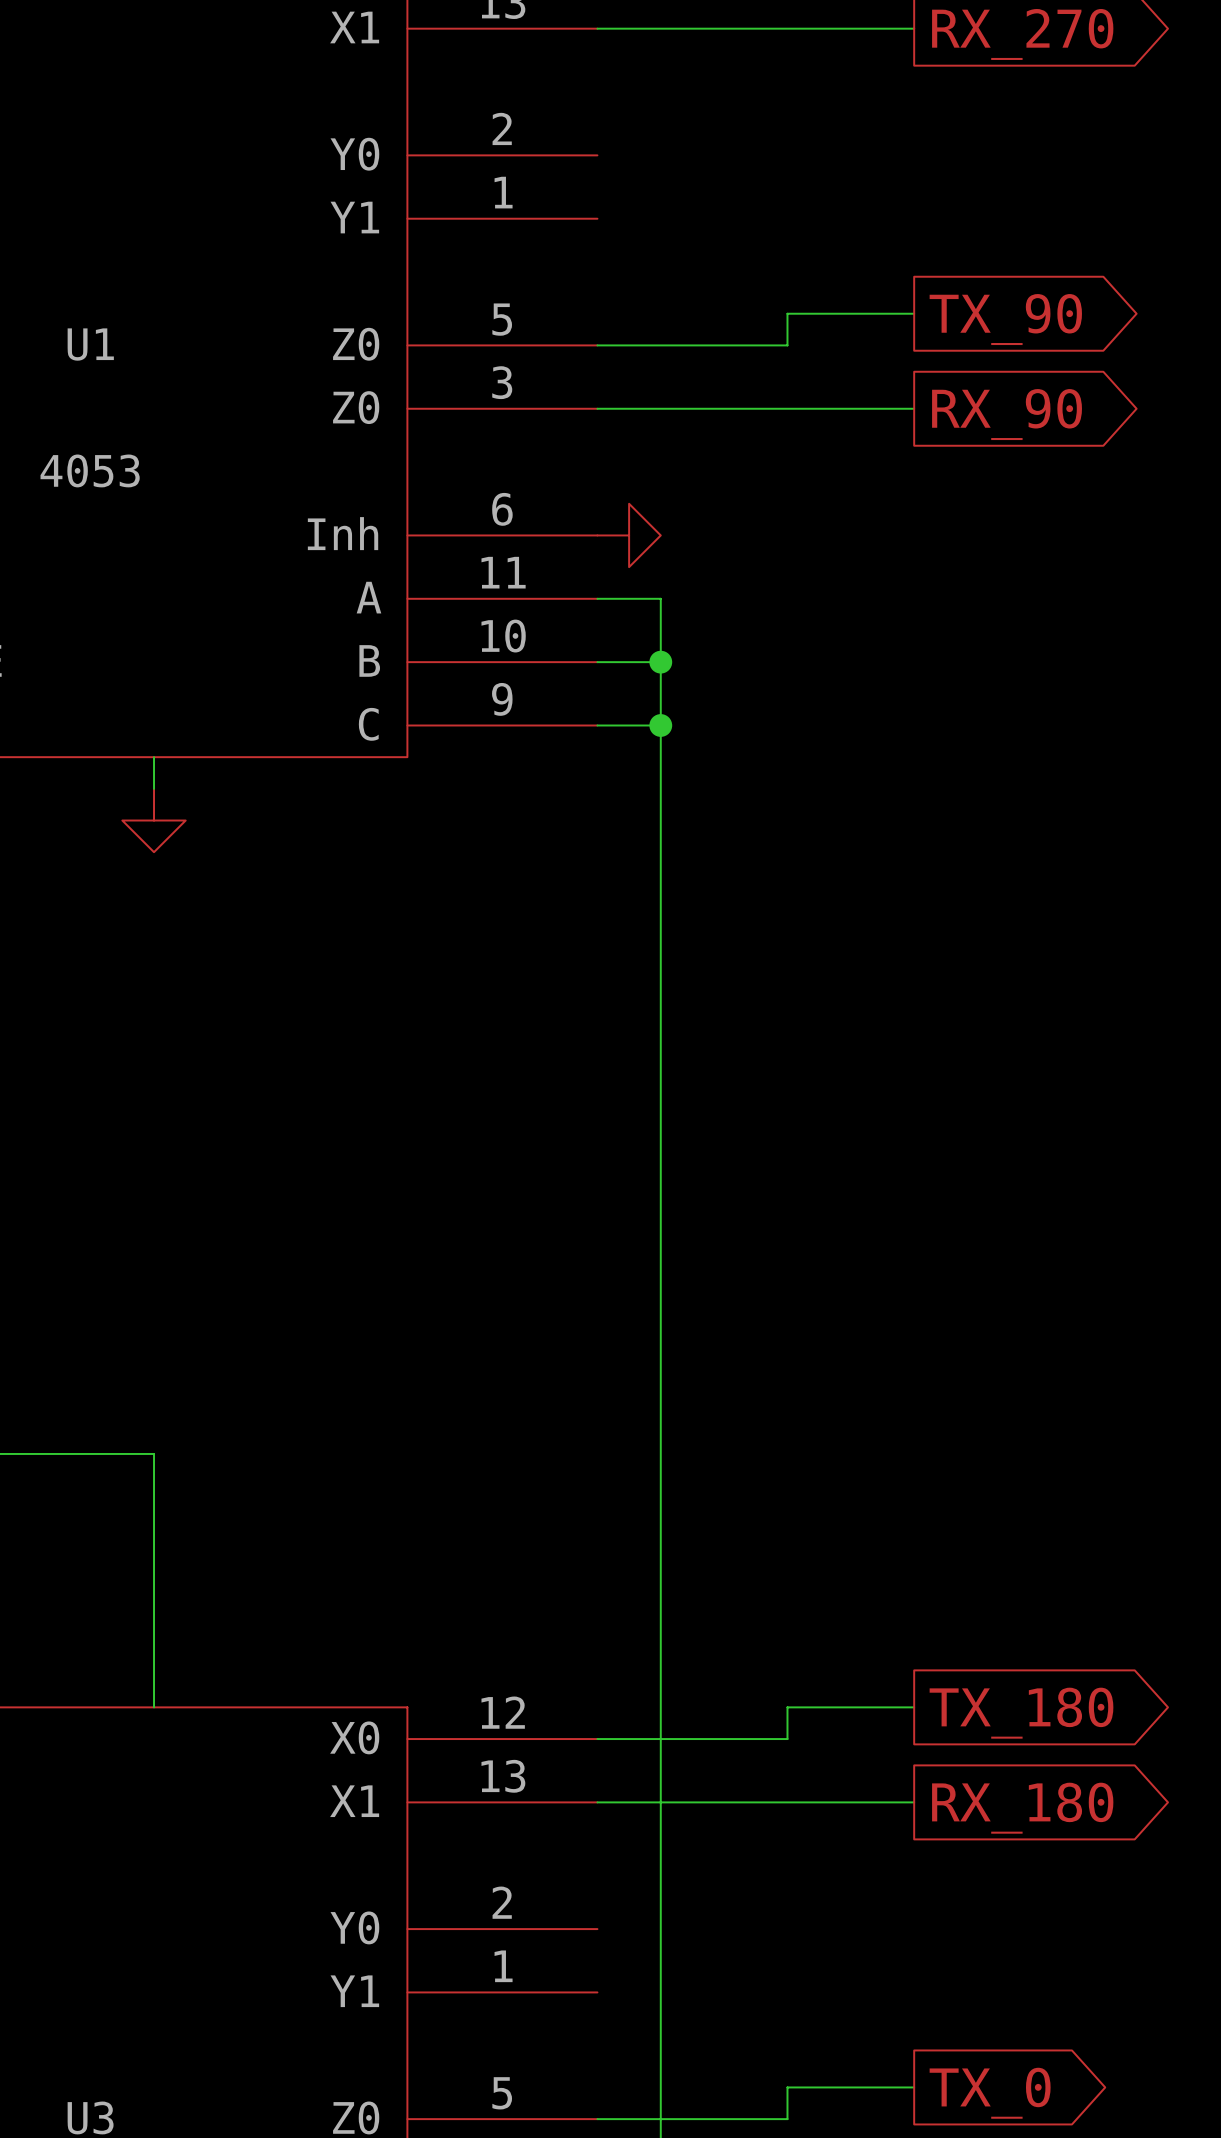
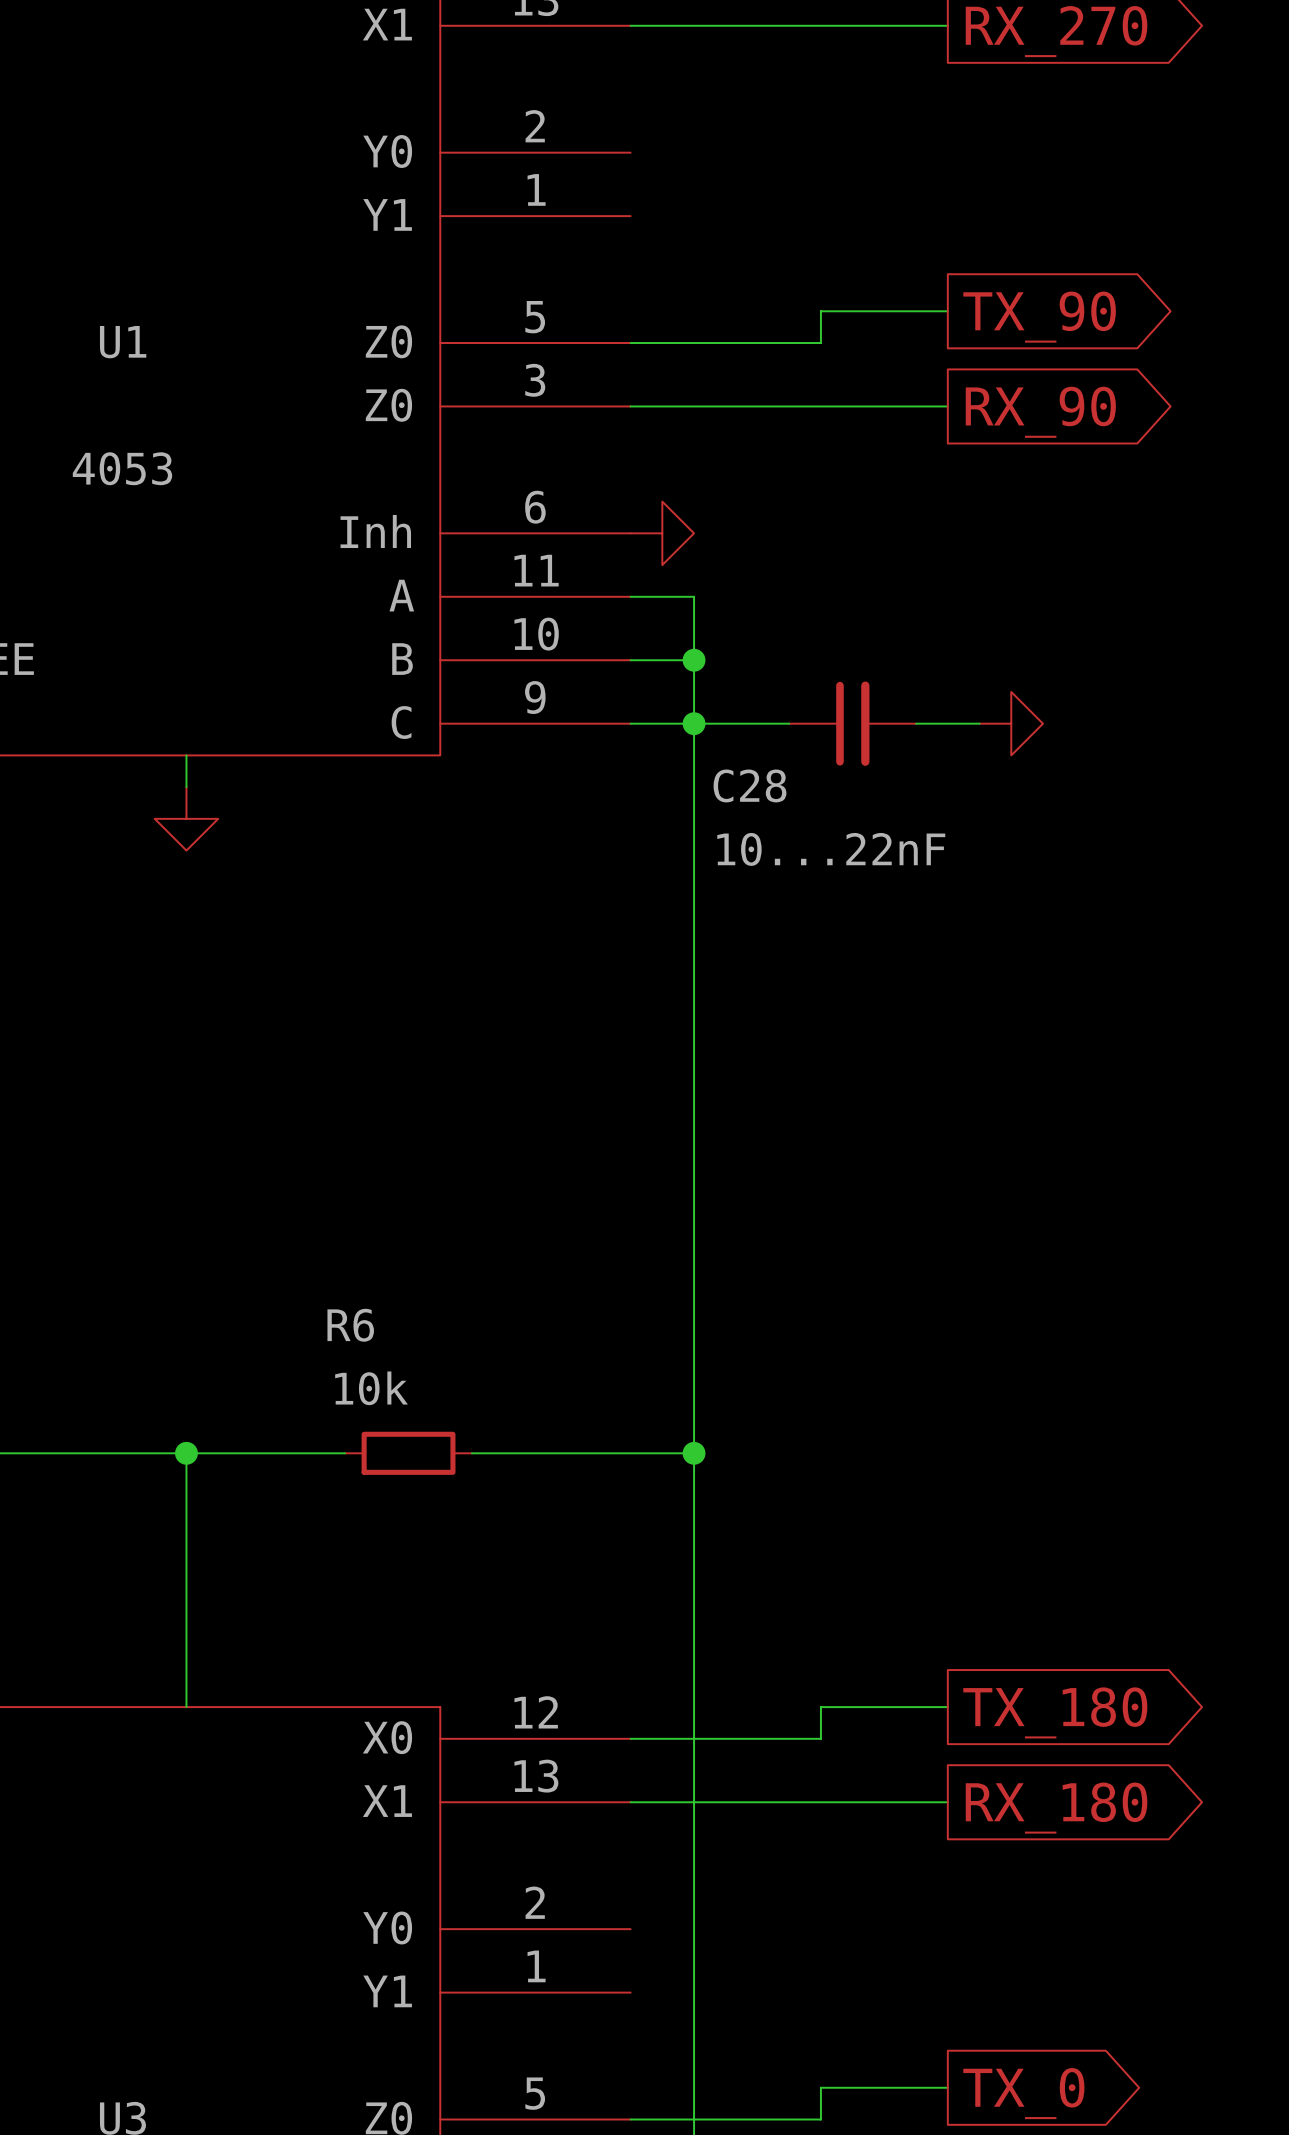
wire: none -> (694, 723) (789, 723)
C28: none -> 10...22nF (852, 723)
wire: none -> (916, 723) (979, 723)
power symbol: none -> (1011, 723)
wire: none -> (186, 1453) (345, 1453)
junction: none -> (186, 1453)
R6: none -> 10k (408, 1453)
wire: none -> (471, 1453) (694, 1453)
junction: none -> (694, 1453)

